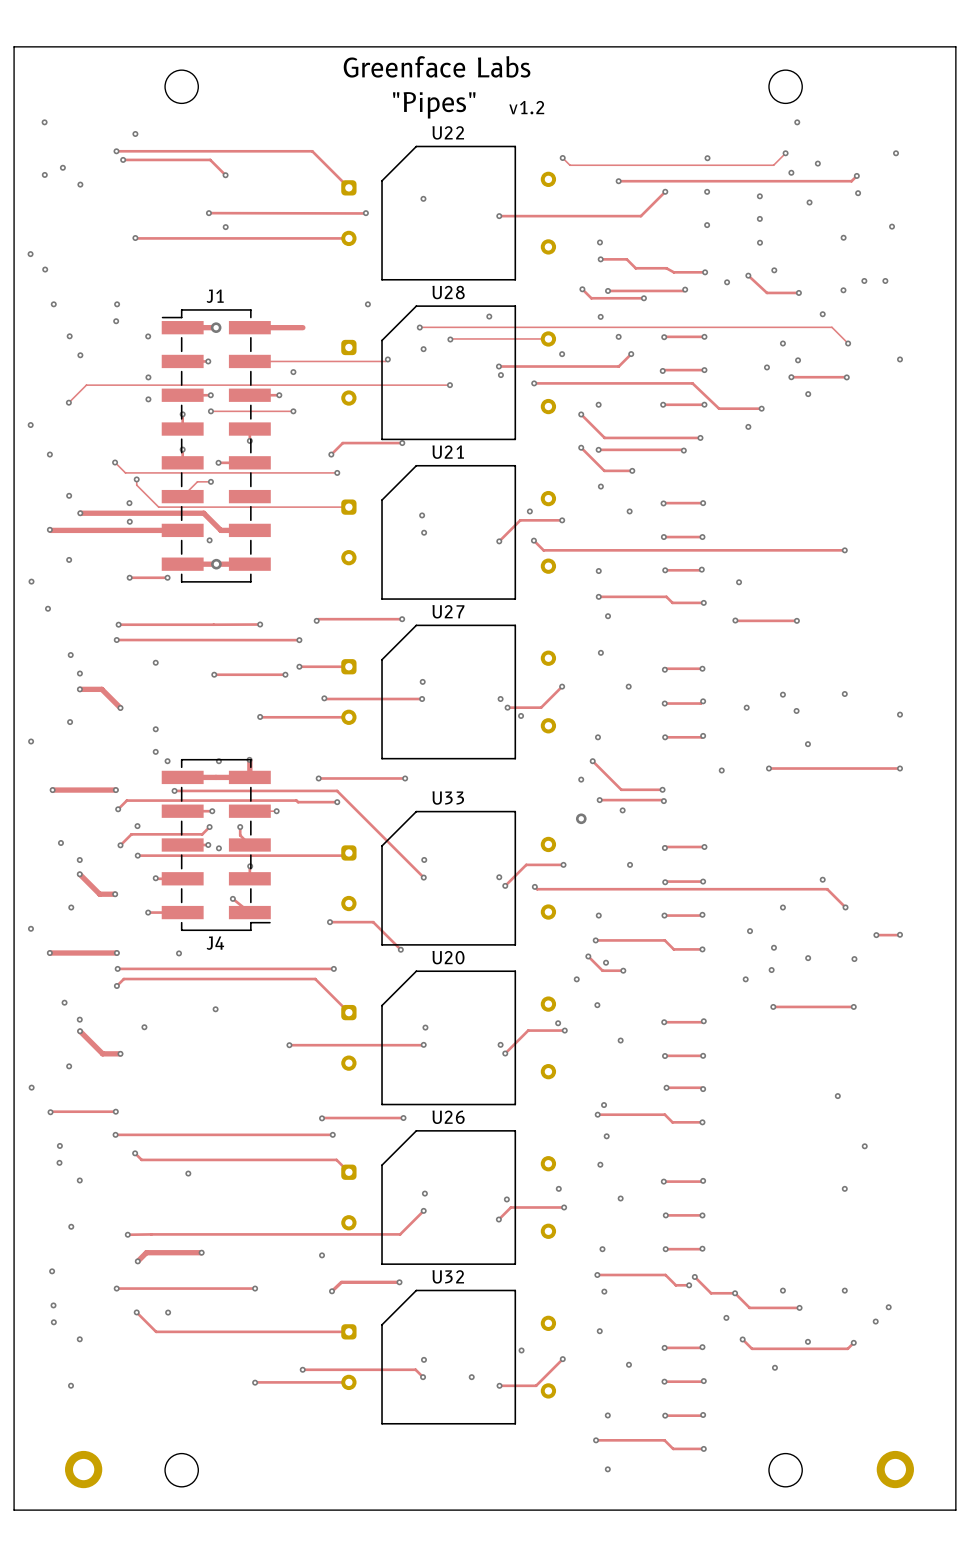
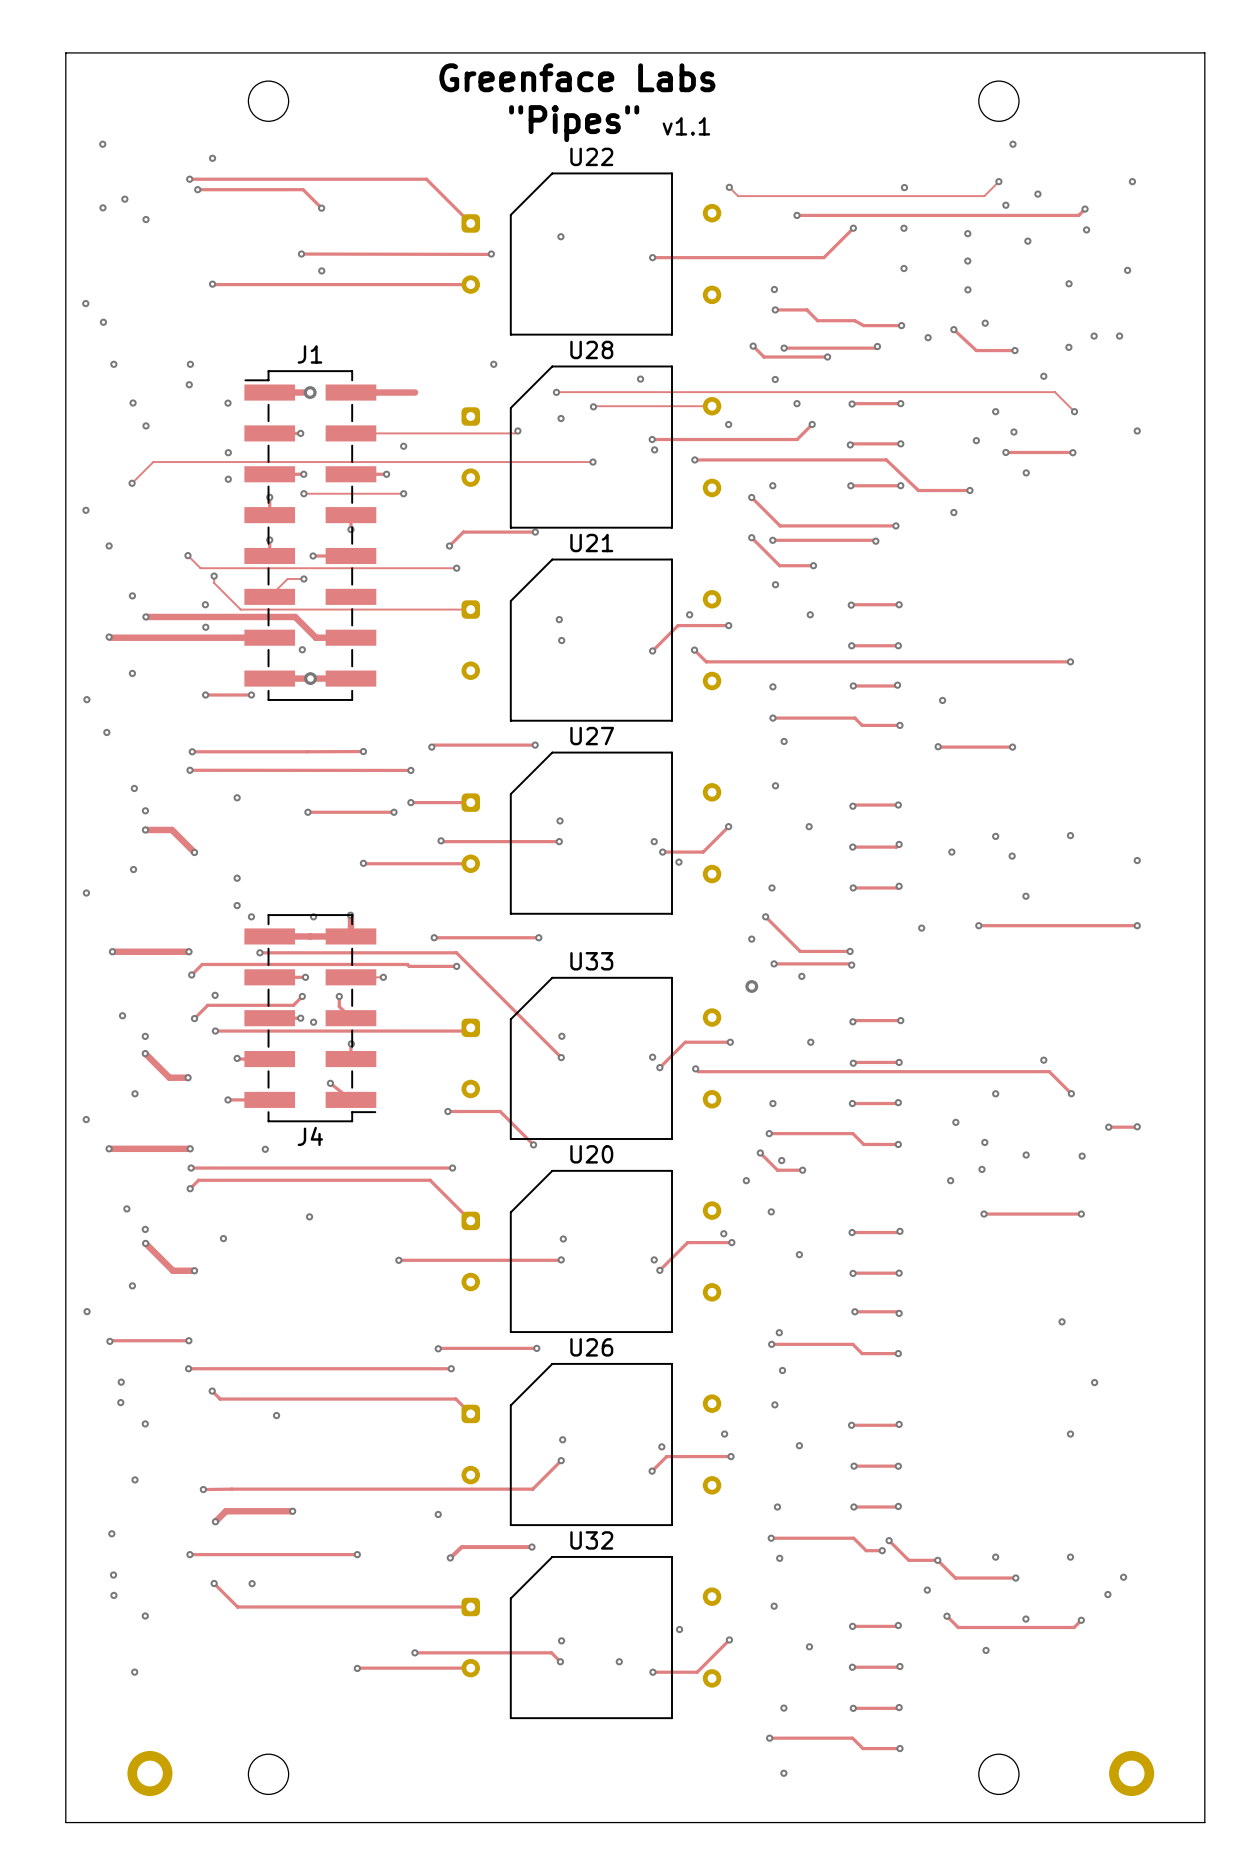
text: v1.2 (526, 107) -> v1.1 (686, 126)

